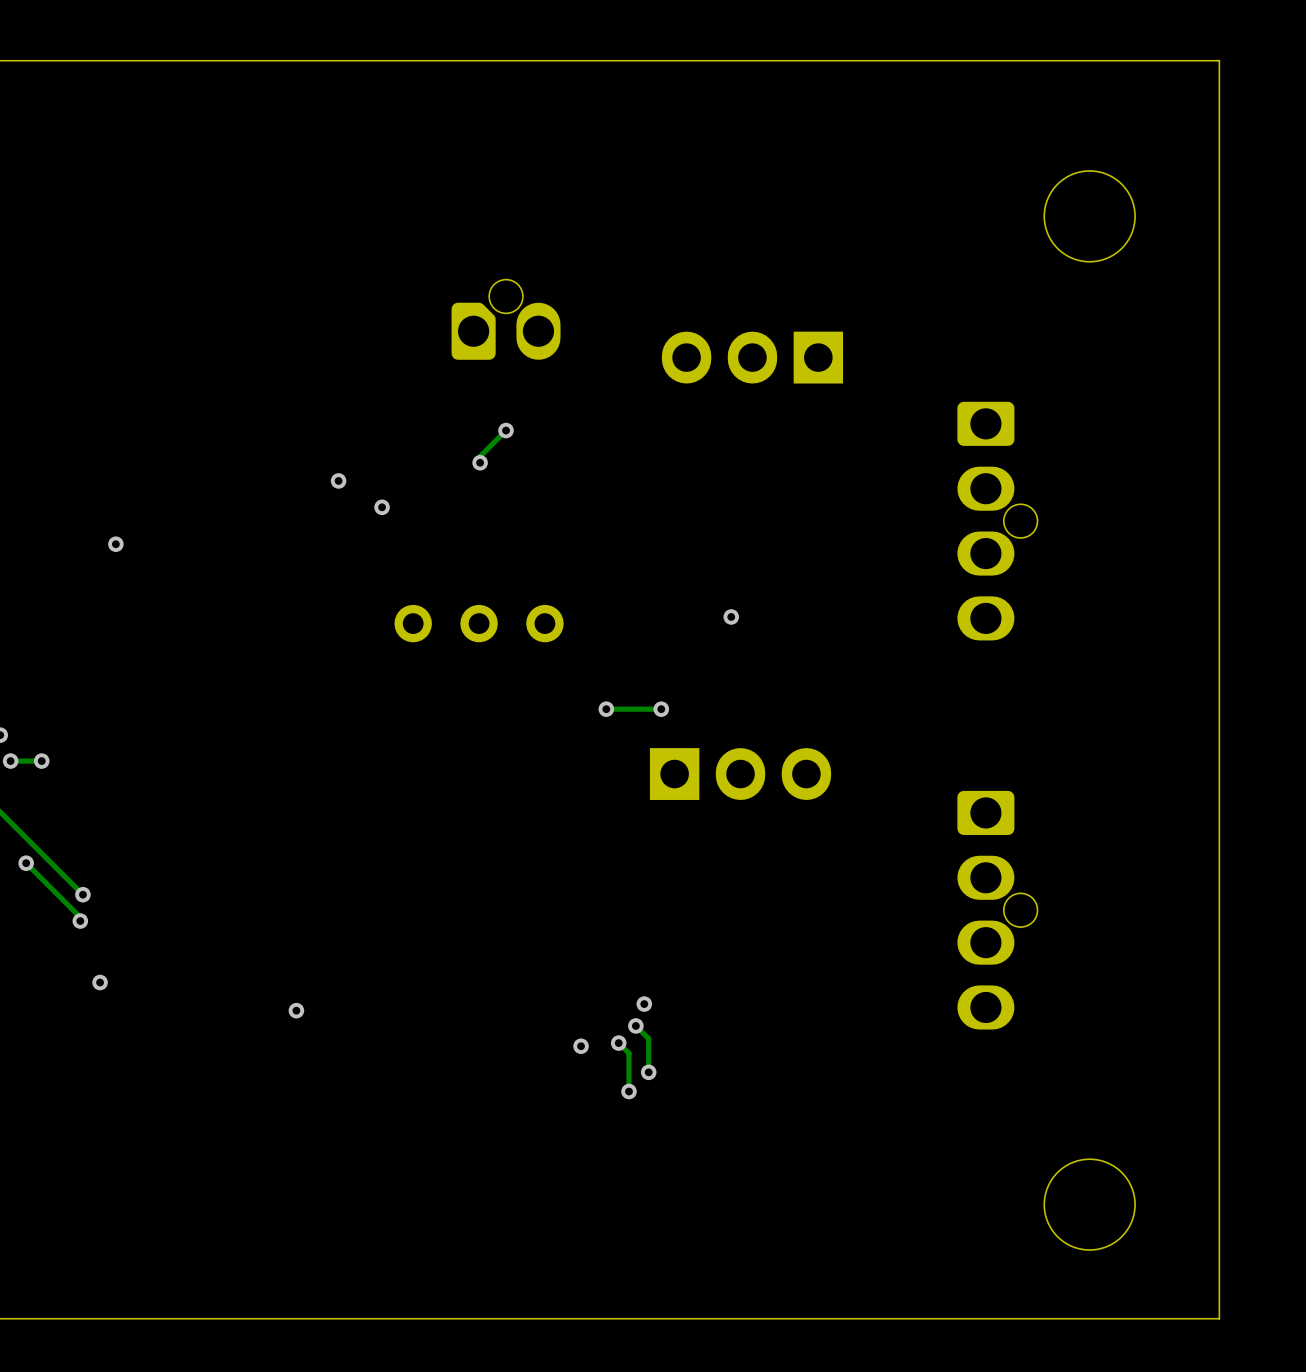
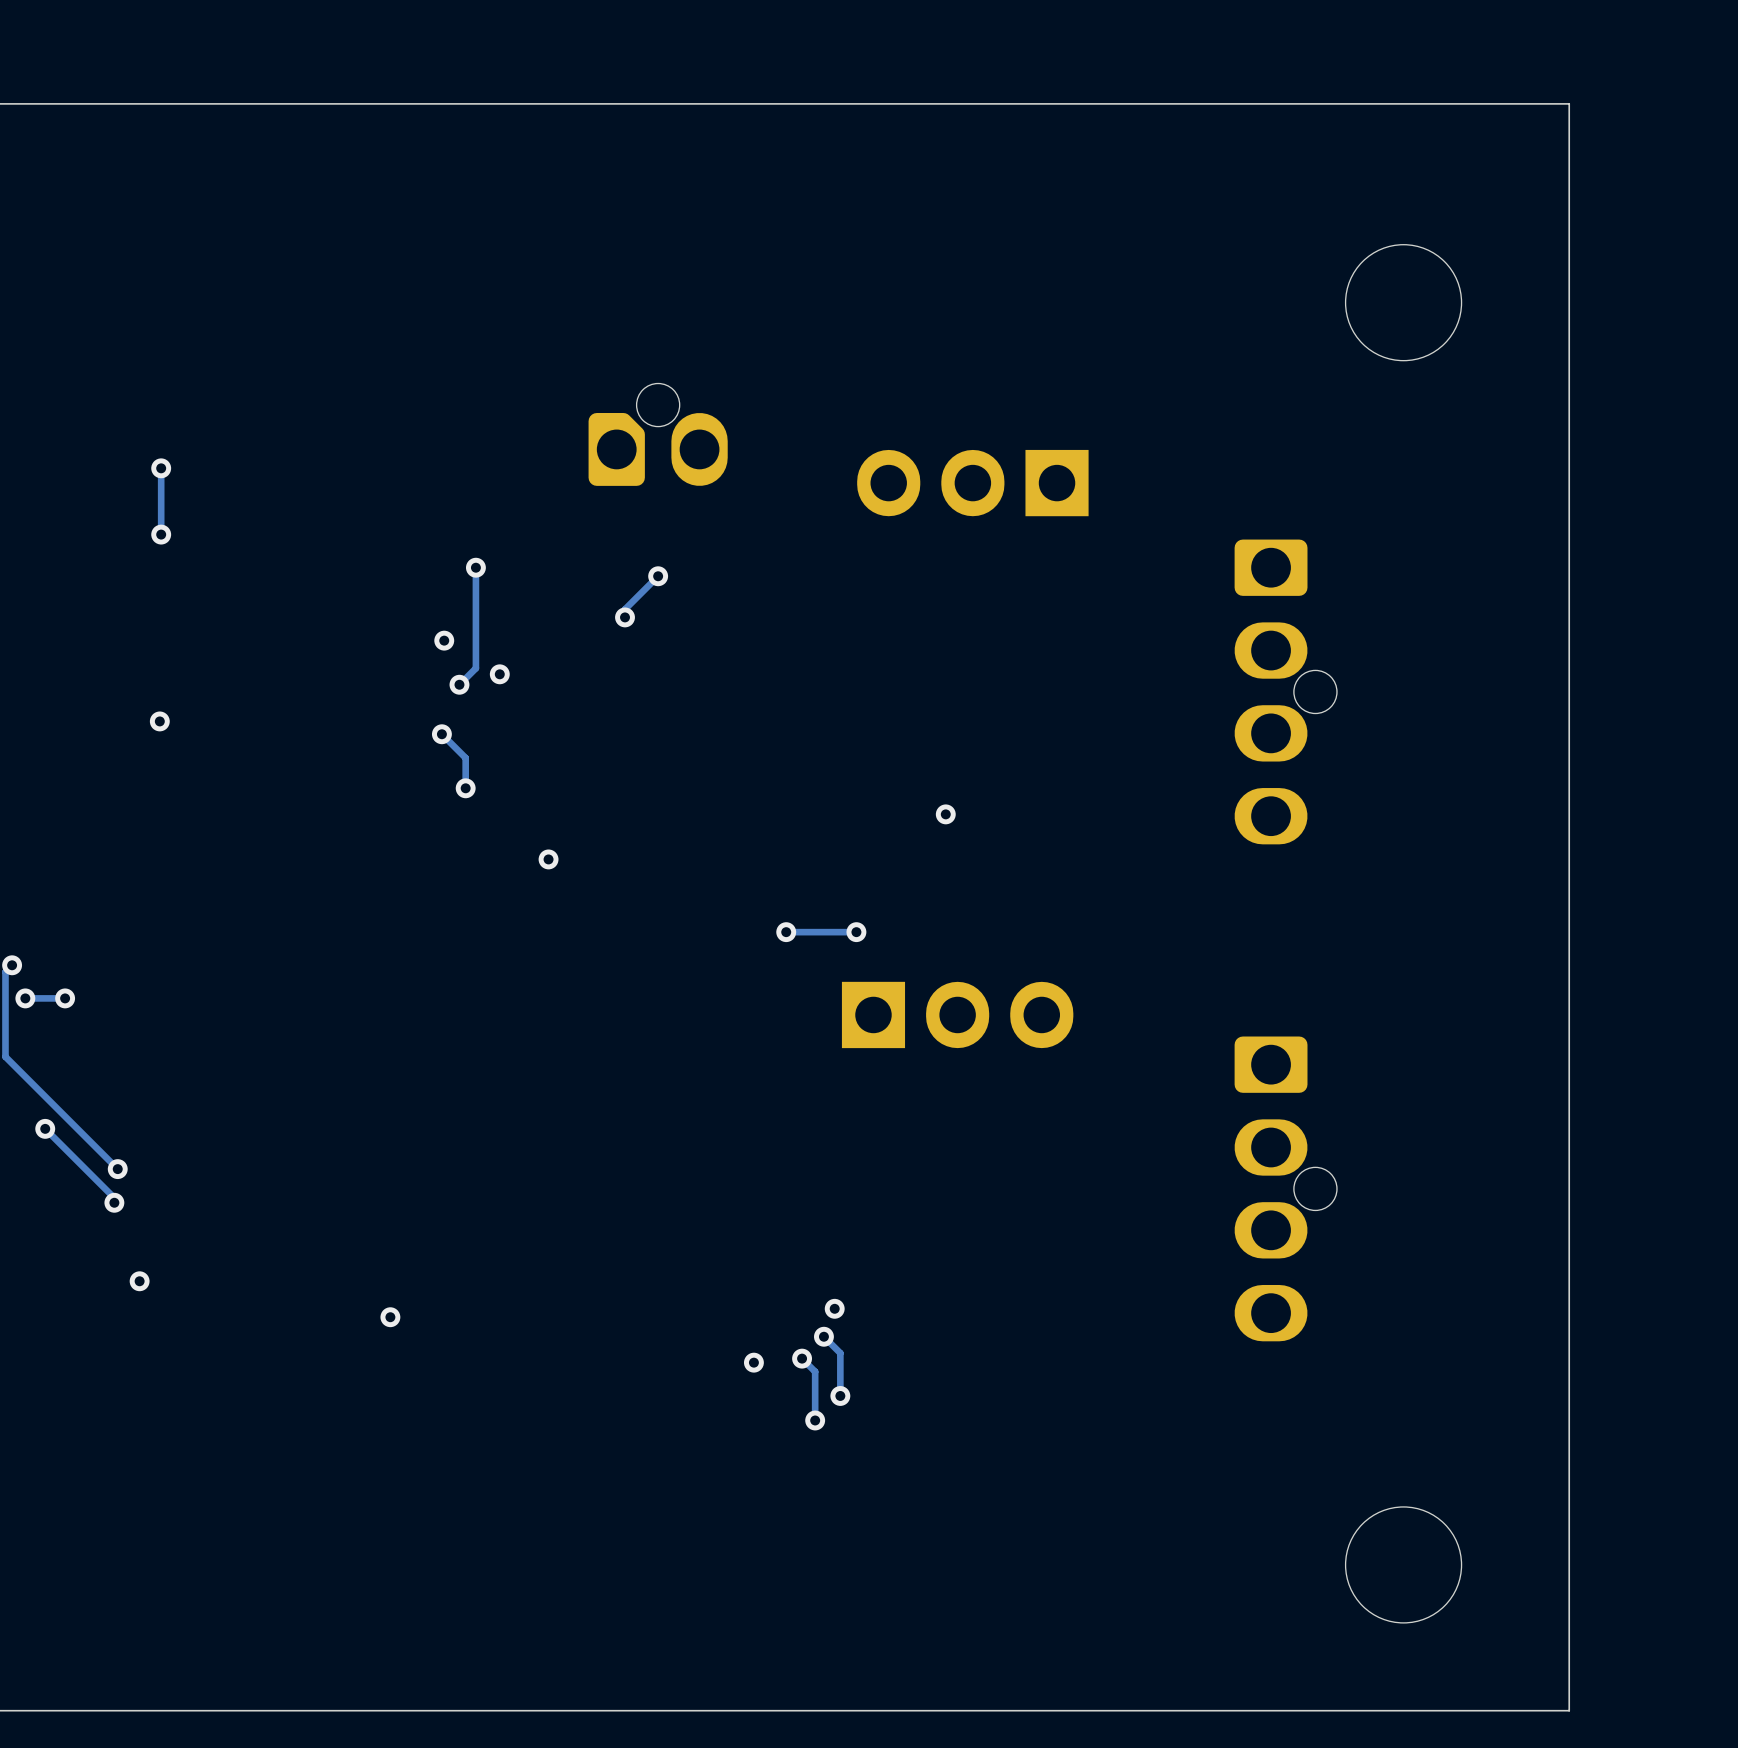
track: none -> (161, 468) (161, 534)
via: none -> (161, 468)
via: none -> (161, 534)
track: none -> (475, 567) (475, 668) (459, 684)
via: none -> (475, 567)
via: none -> (459, 684)
track: none -> (441, 734) (465, 758) (465, 788)
via: none -> (441, 734)
via: none -> (465, 788)
part: (479, 623) -> none
via: none -> (548, 859)

